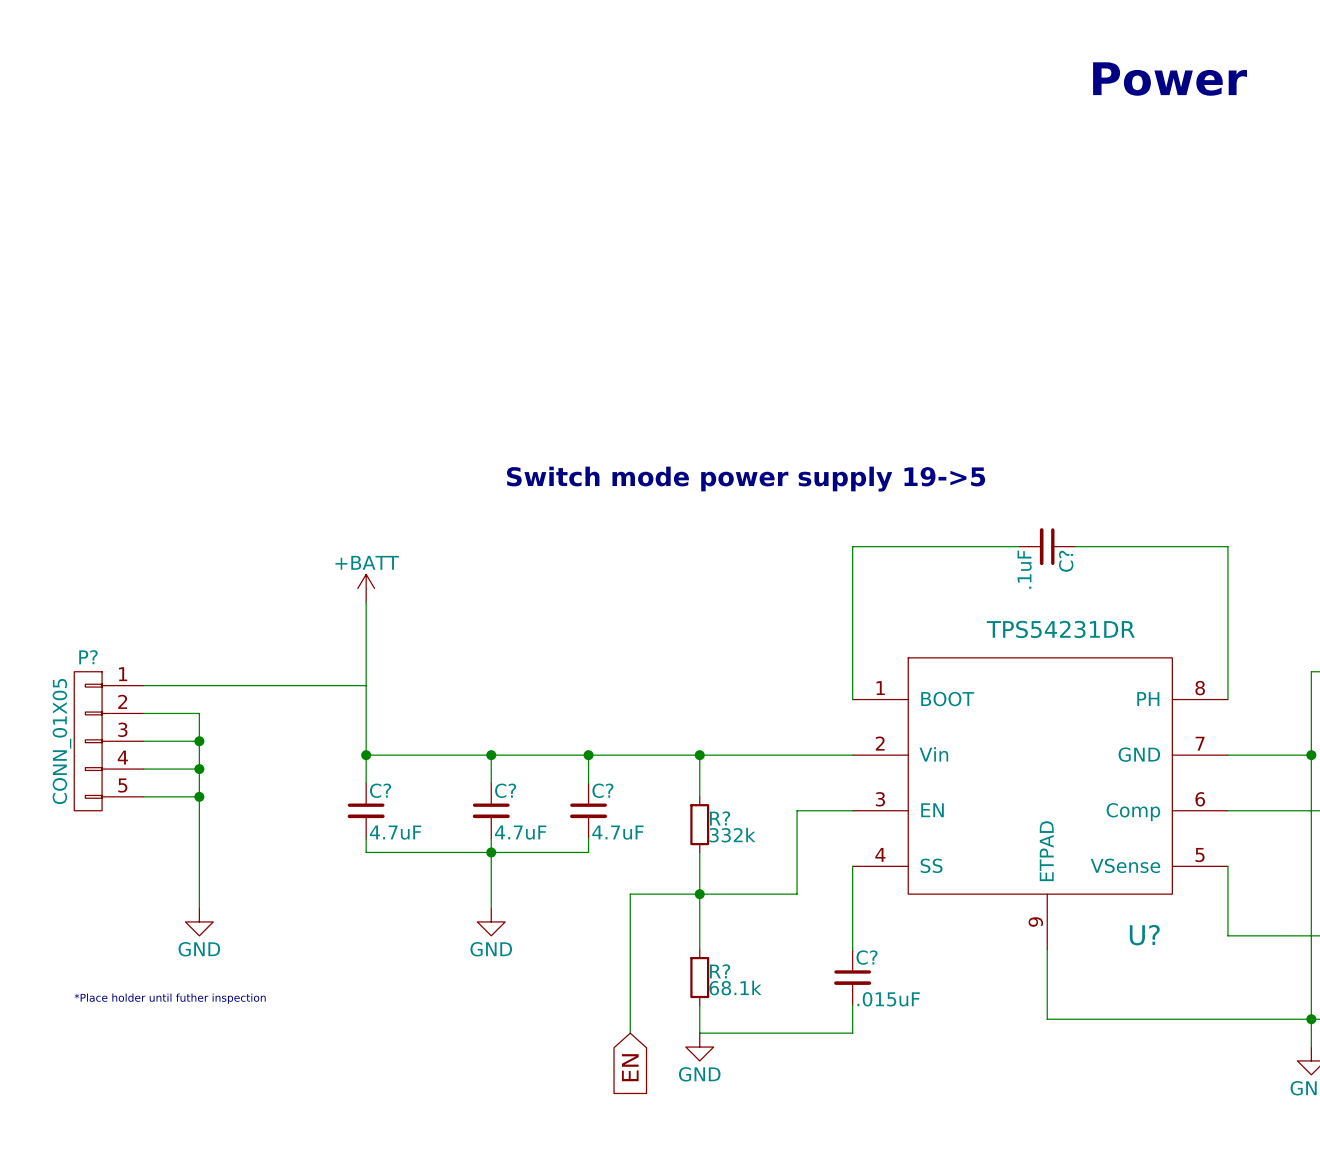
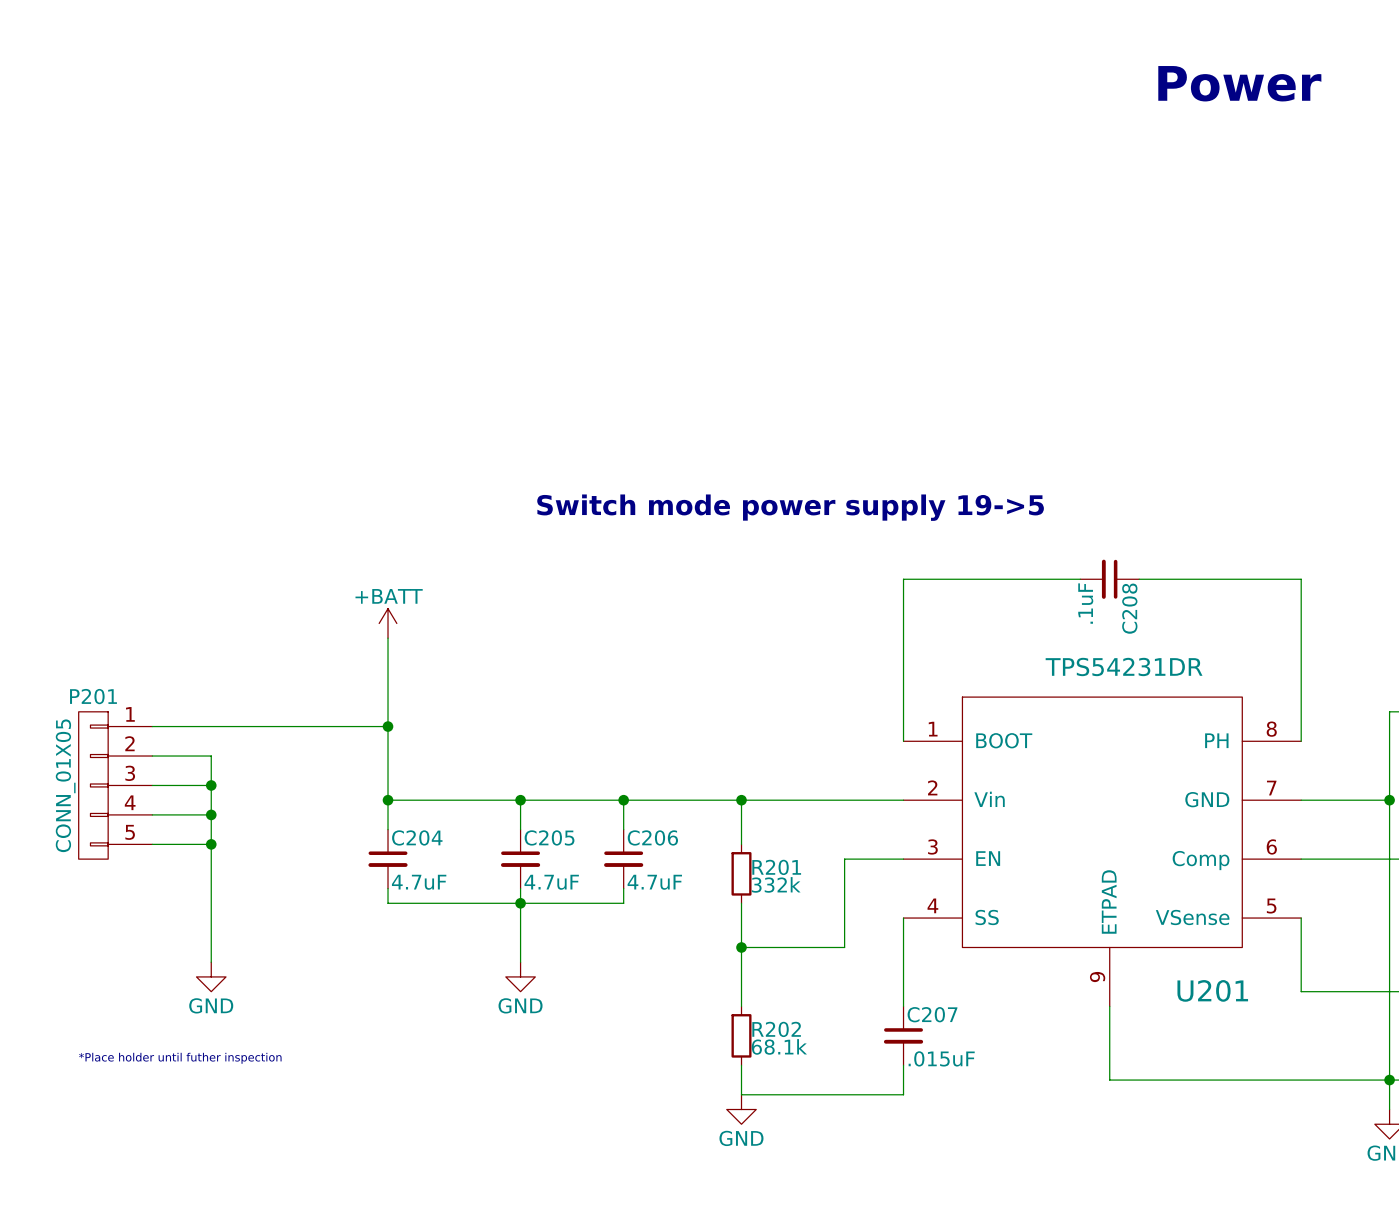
C? name: C? (1066, 561) -> C208 (1129, 608)
P? name: P? (88, 657) -> P201 (93, 696)
junction: none -> (388, 726)
C? name: C? (380, 790) -> C204 (417, 837)
C? name: C? (505, 790) -> C205 (549, 837)
C? name: C? (602, 790) -> C206 (652, 837)
R? name: R? (720, 818) -> R201 (776, 867)
wire: (699, 894) (630, 894) (630, 1033) -> none
U? name: U? (1144, 935) -> U201 (1212, 990)
C? name: C? (867, 957) -> C207 (932, 1014)
R? name: R? (720, 971) -> R202 (776, 1029)
global label: EN (630, 1067) -> none

